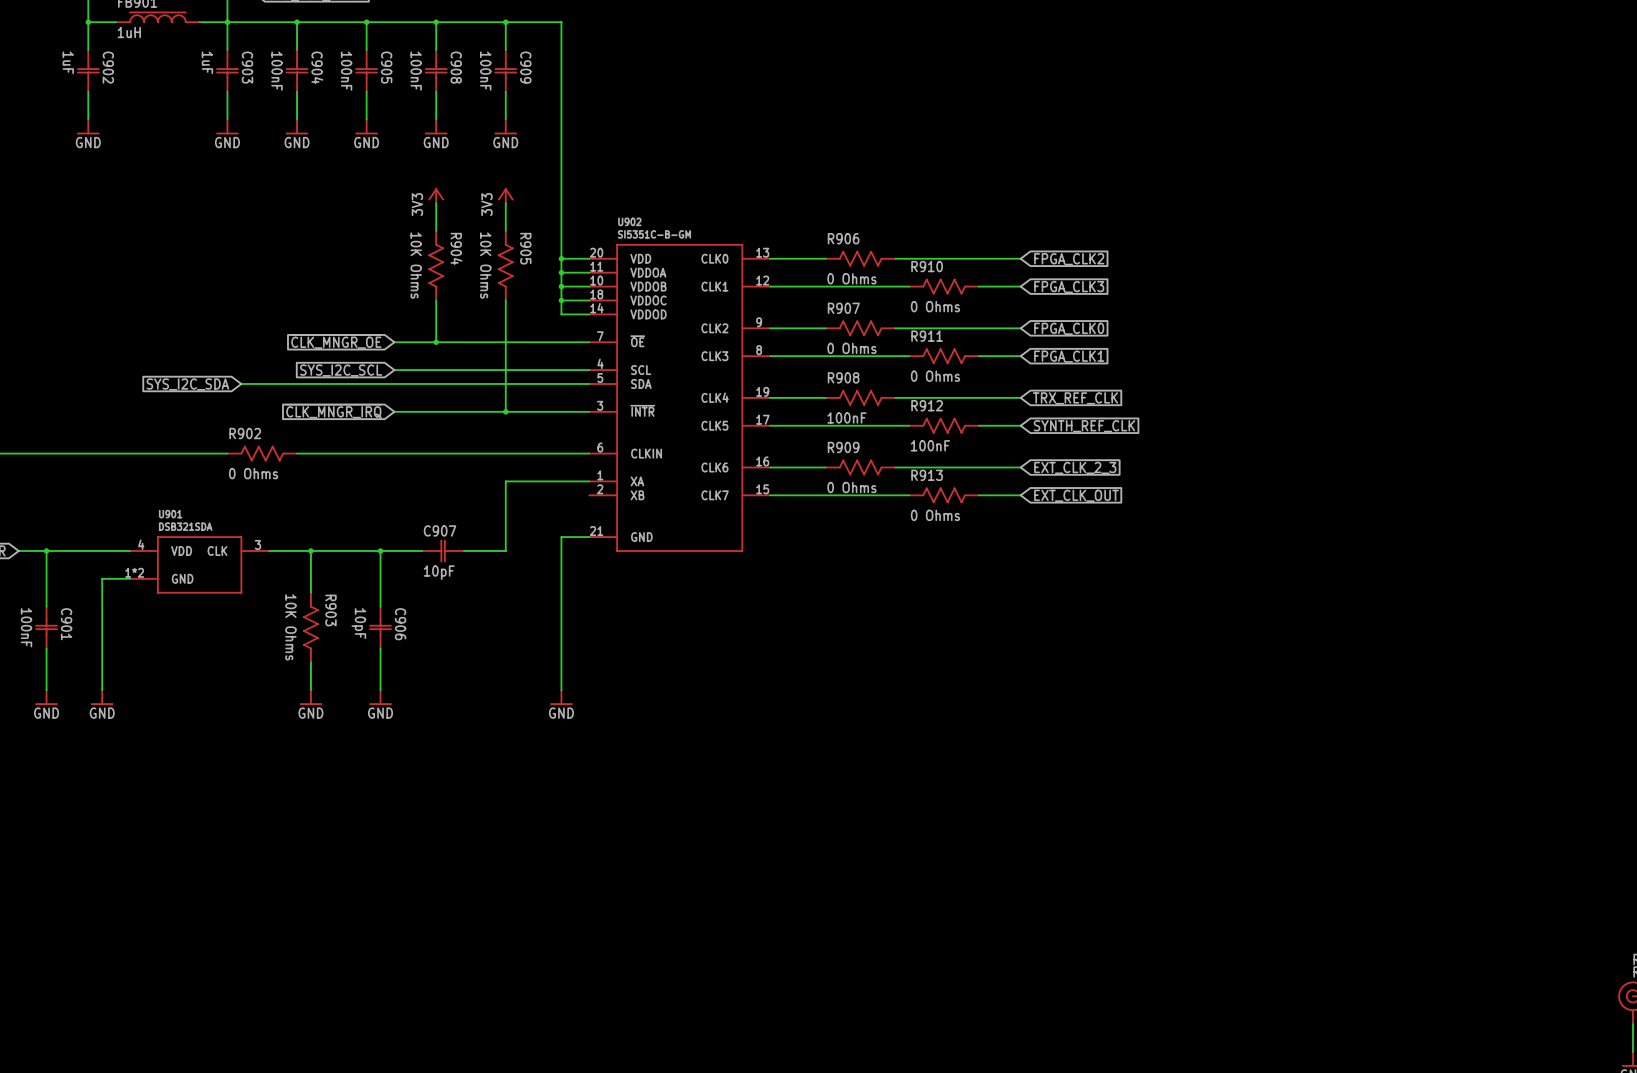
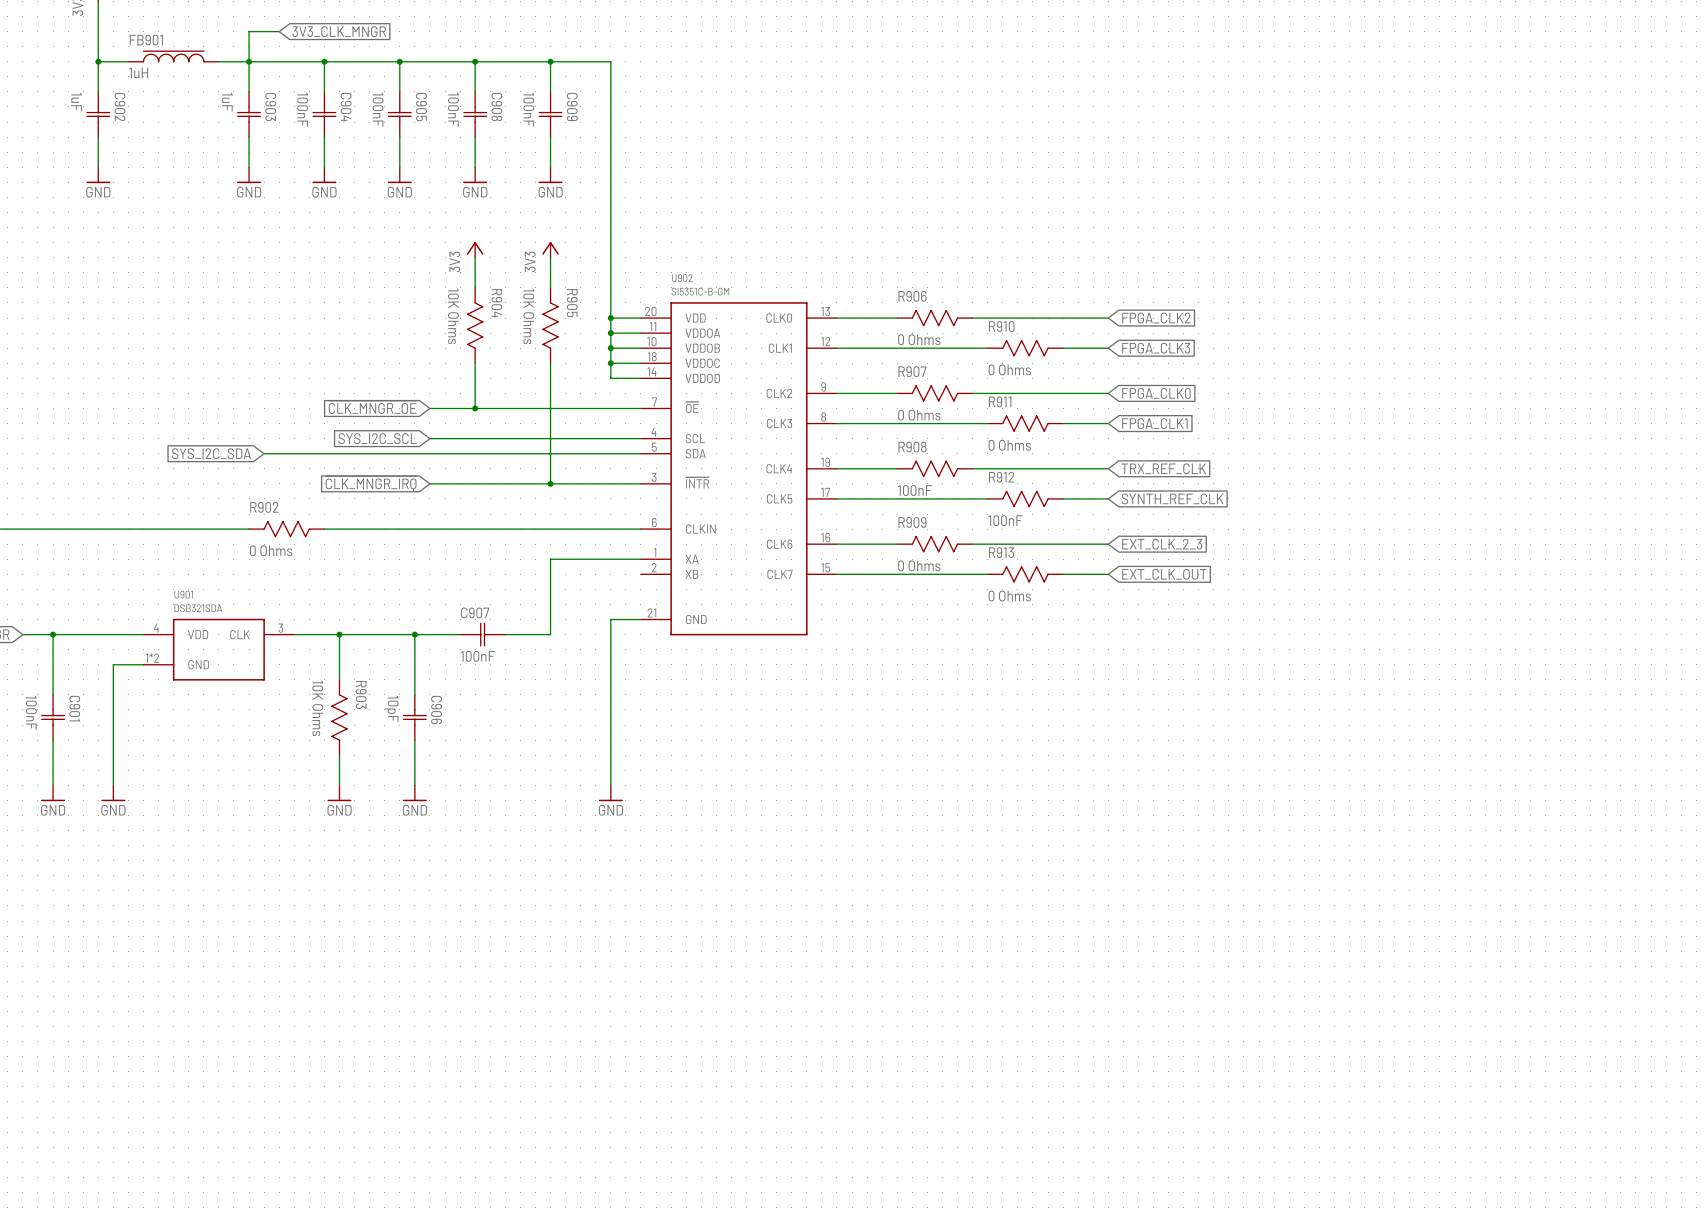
C907 value: 10pF (439, 572) -> 100nF (477, 656)

